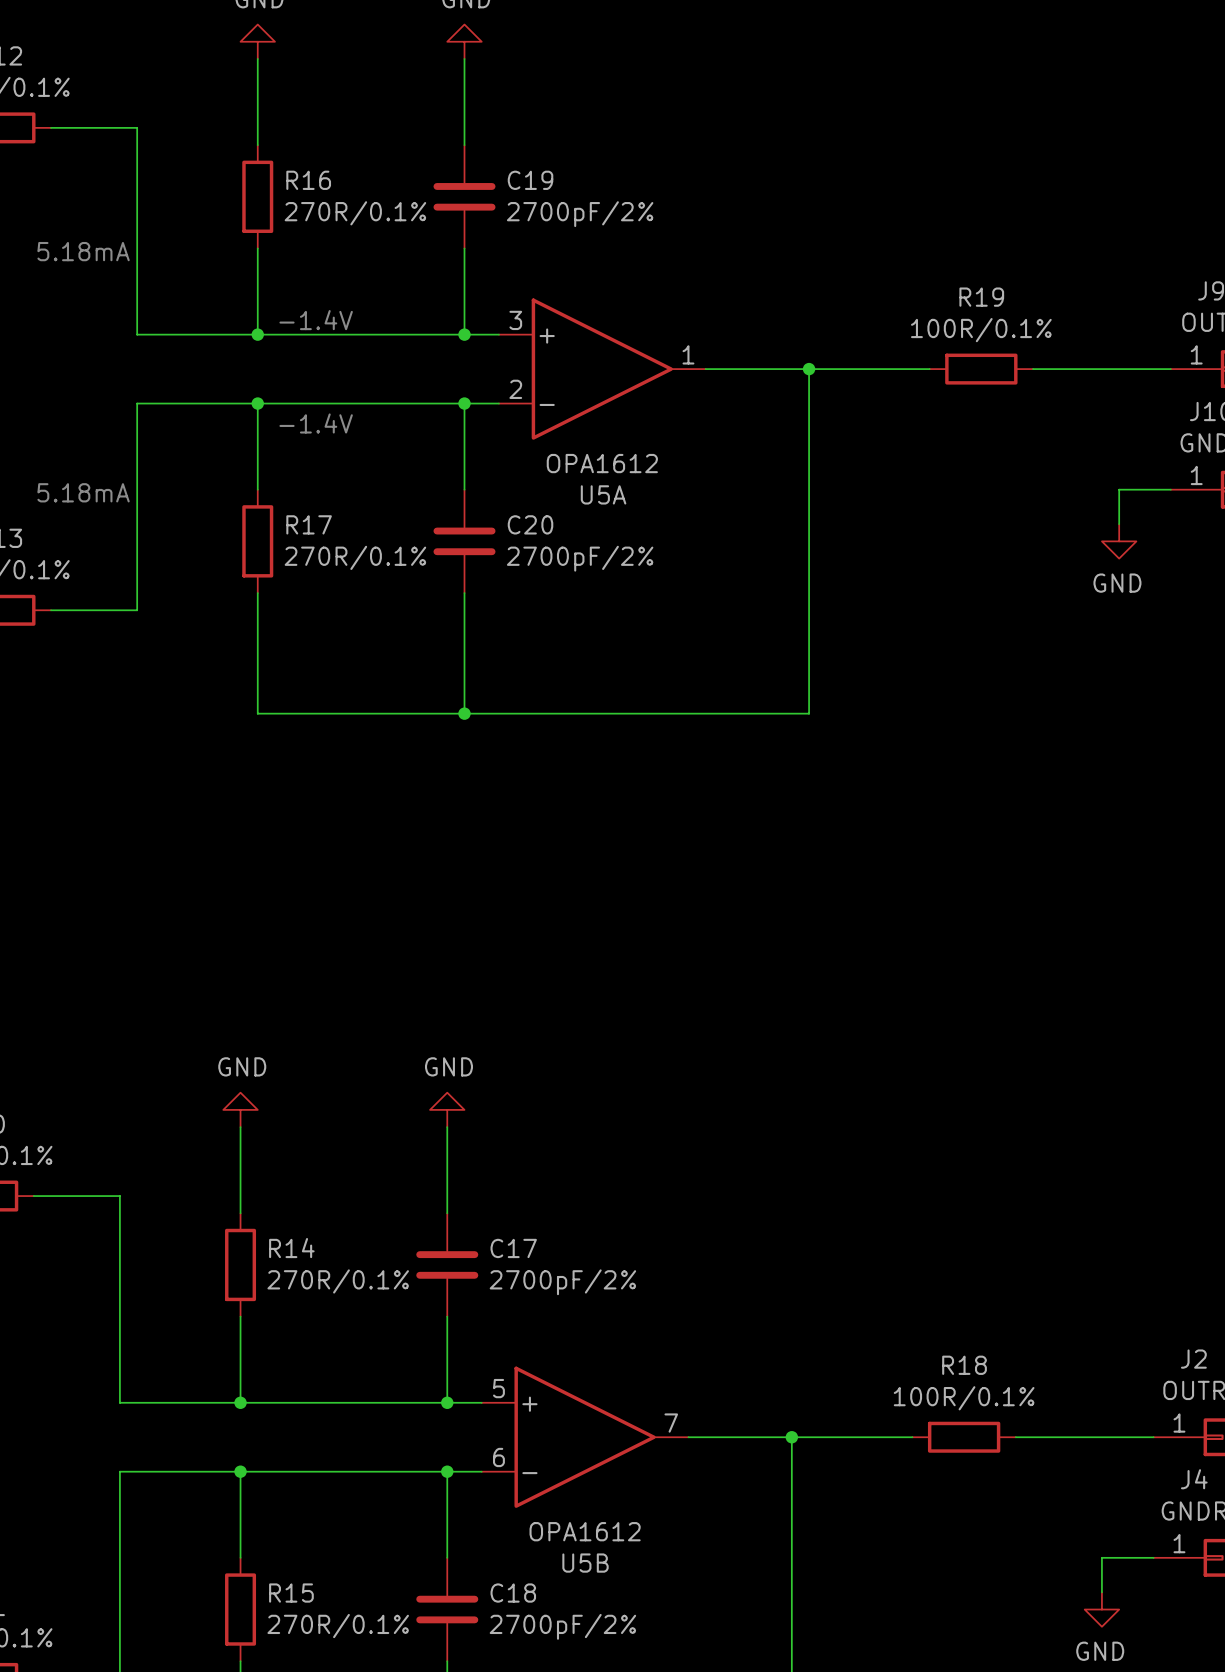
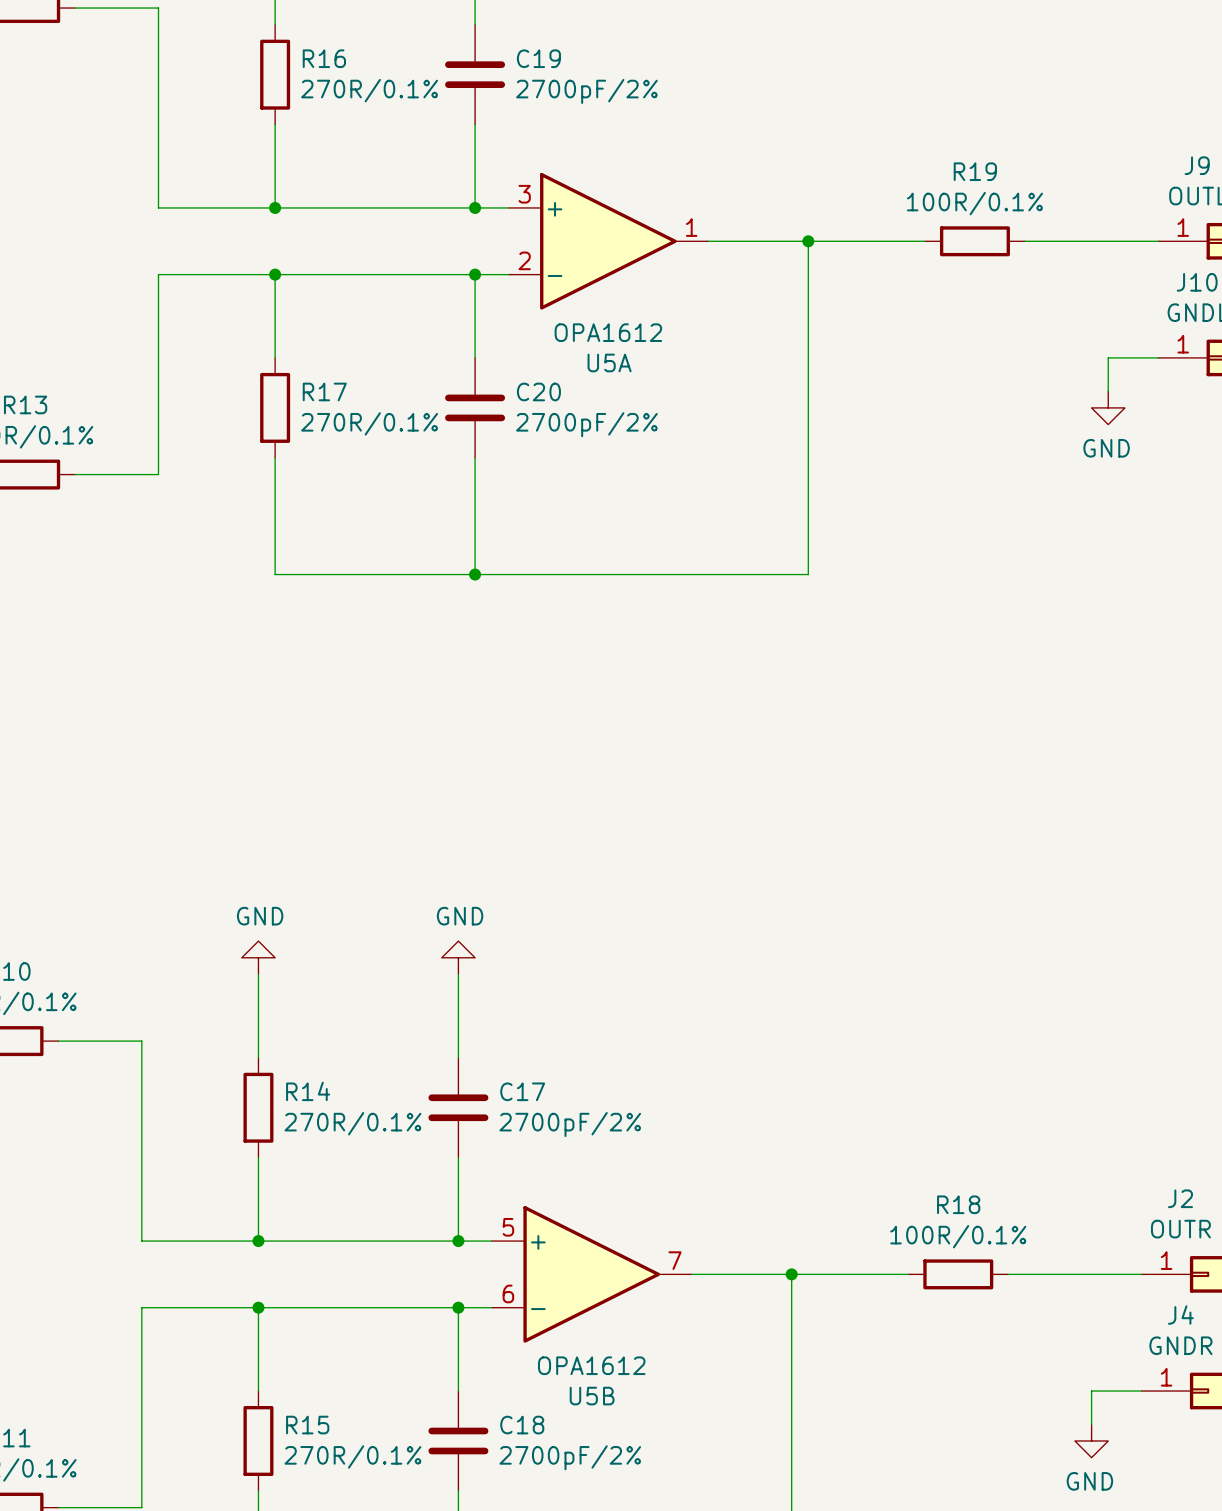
text: 5.18mA (83, 251) -> none
text: -1.4V (316, 320) -> none
text: -1.4V (316, 423) -> none
text: 5.18mA (83, 492) -> none

